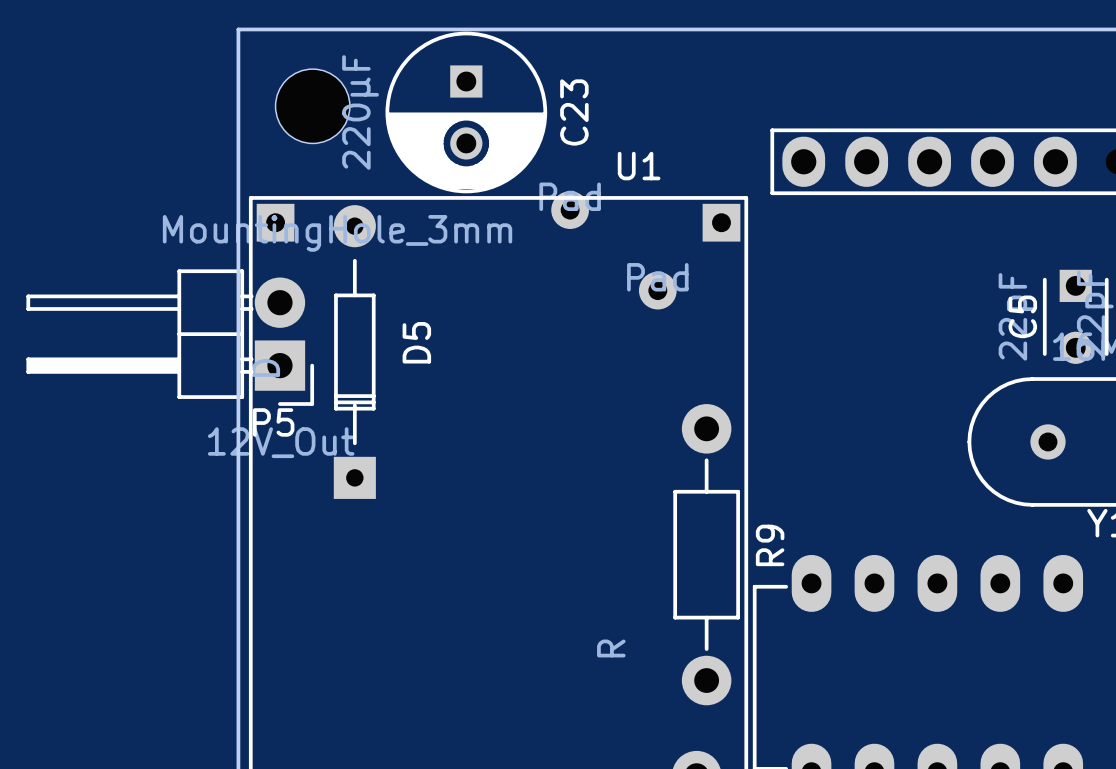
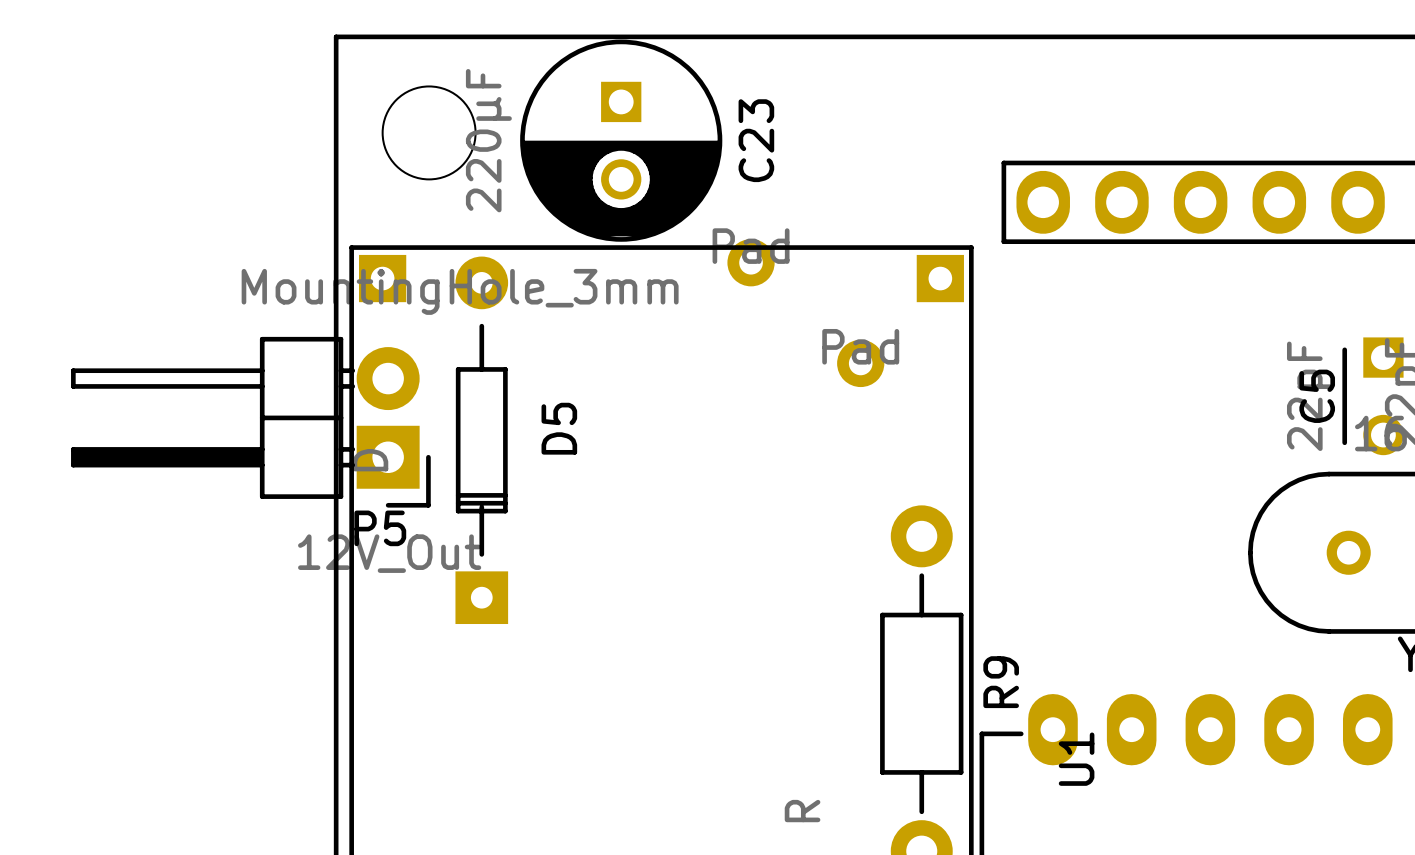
U1 name rotation: 0° (639, 166) -> 90° counterclockwise (1076, 759)
U1 name position: U1 (639, 166) -> U1 (1076, 759)

